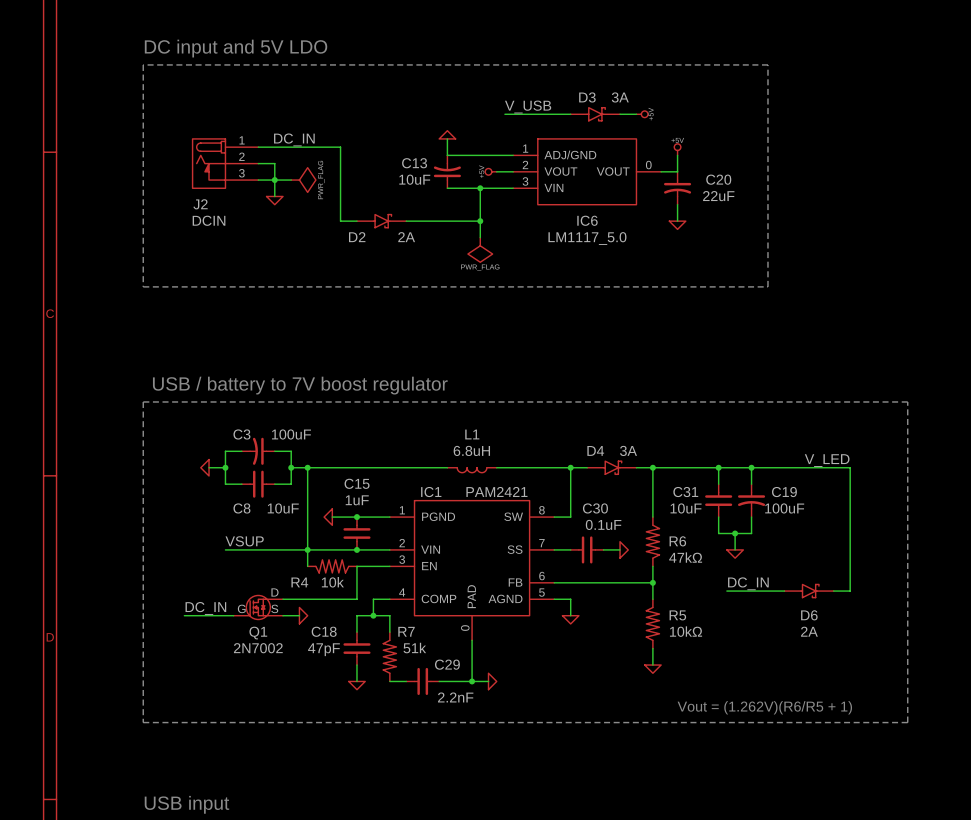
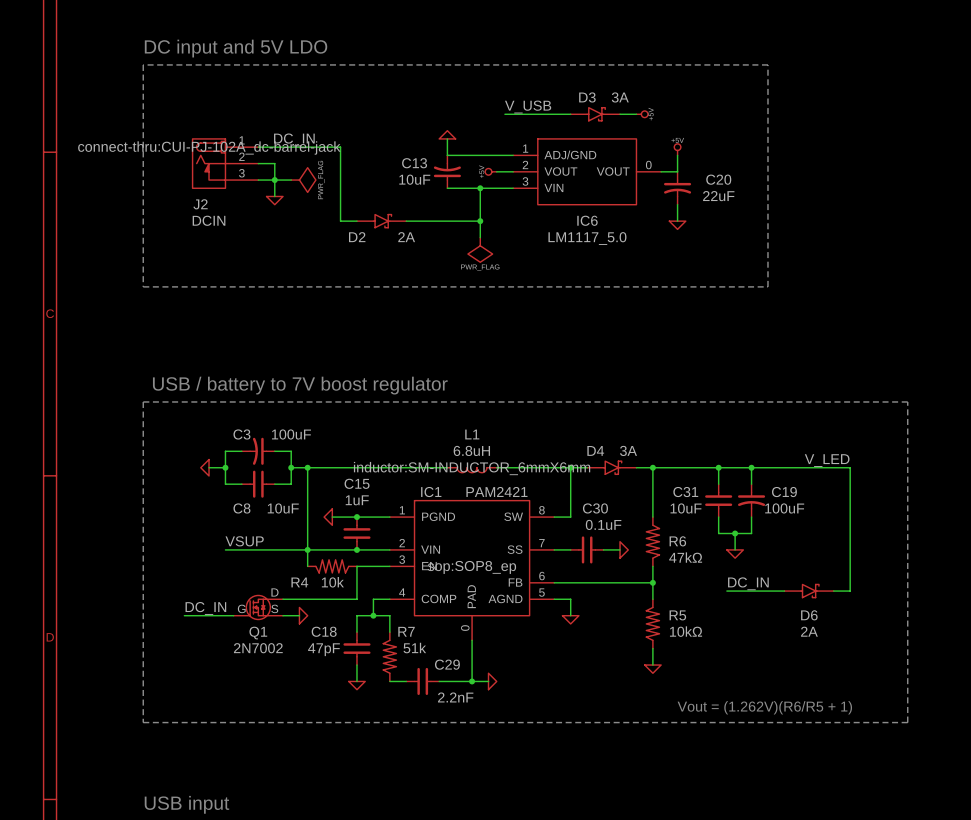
J2 text: none -> connect-thru:CUI-PJ-102A_dc-barrel-jack (209, 148)
L1 text: none -> inductor:SM-INDUCTOR_6mmX6mm (472, 468)
IC1 text: none -> sop:SOP8_ep (471, 567)

